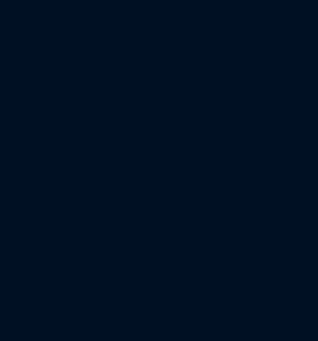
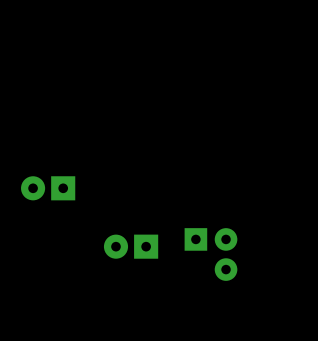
part: none -> (48, 188)
part: none -> (131, 246)
part: none -> (210, 254)

